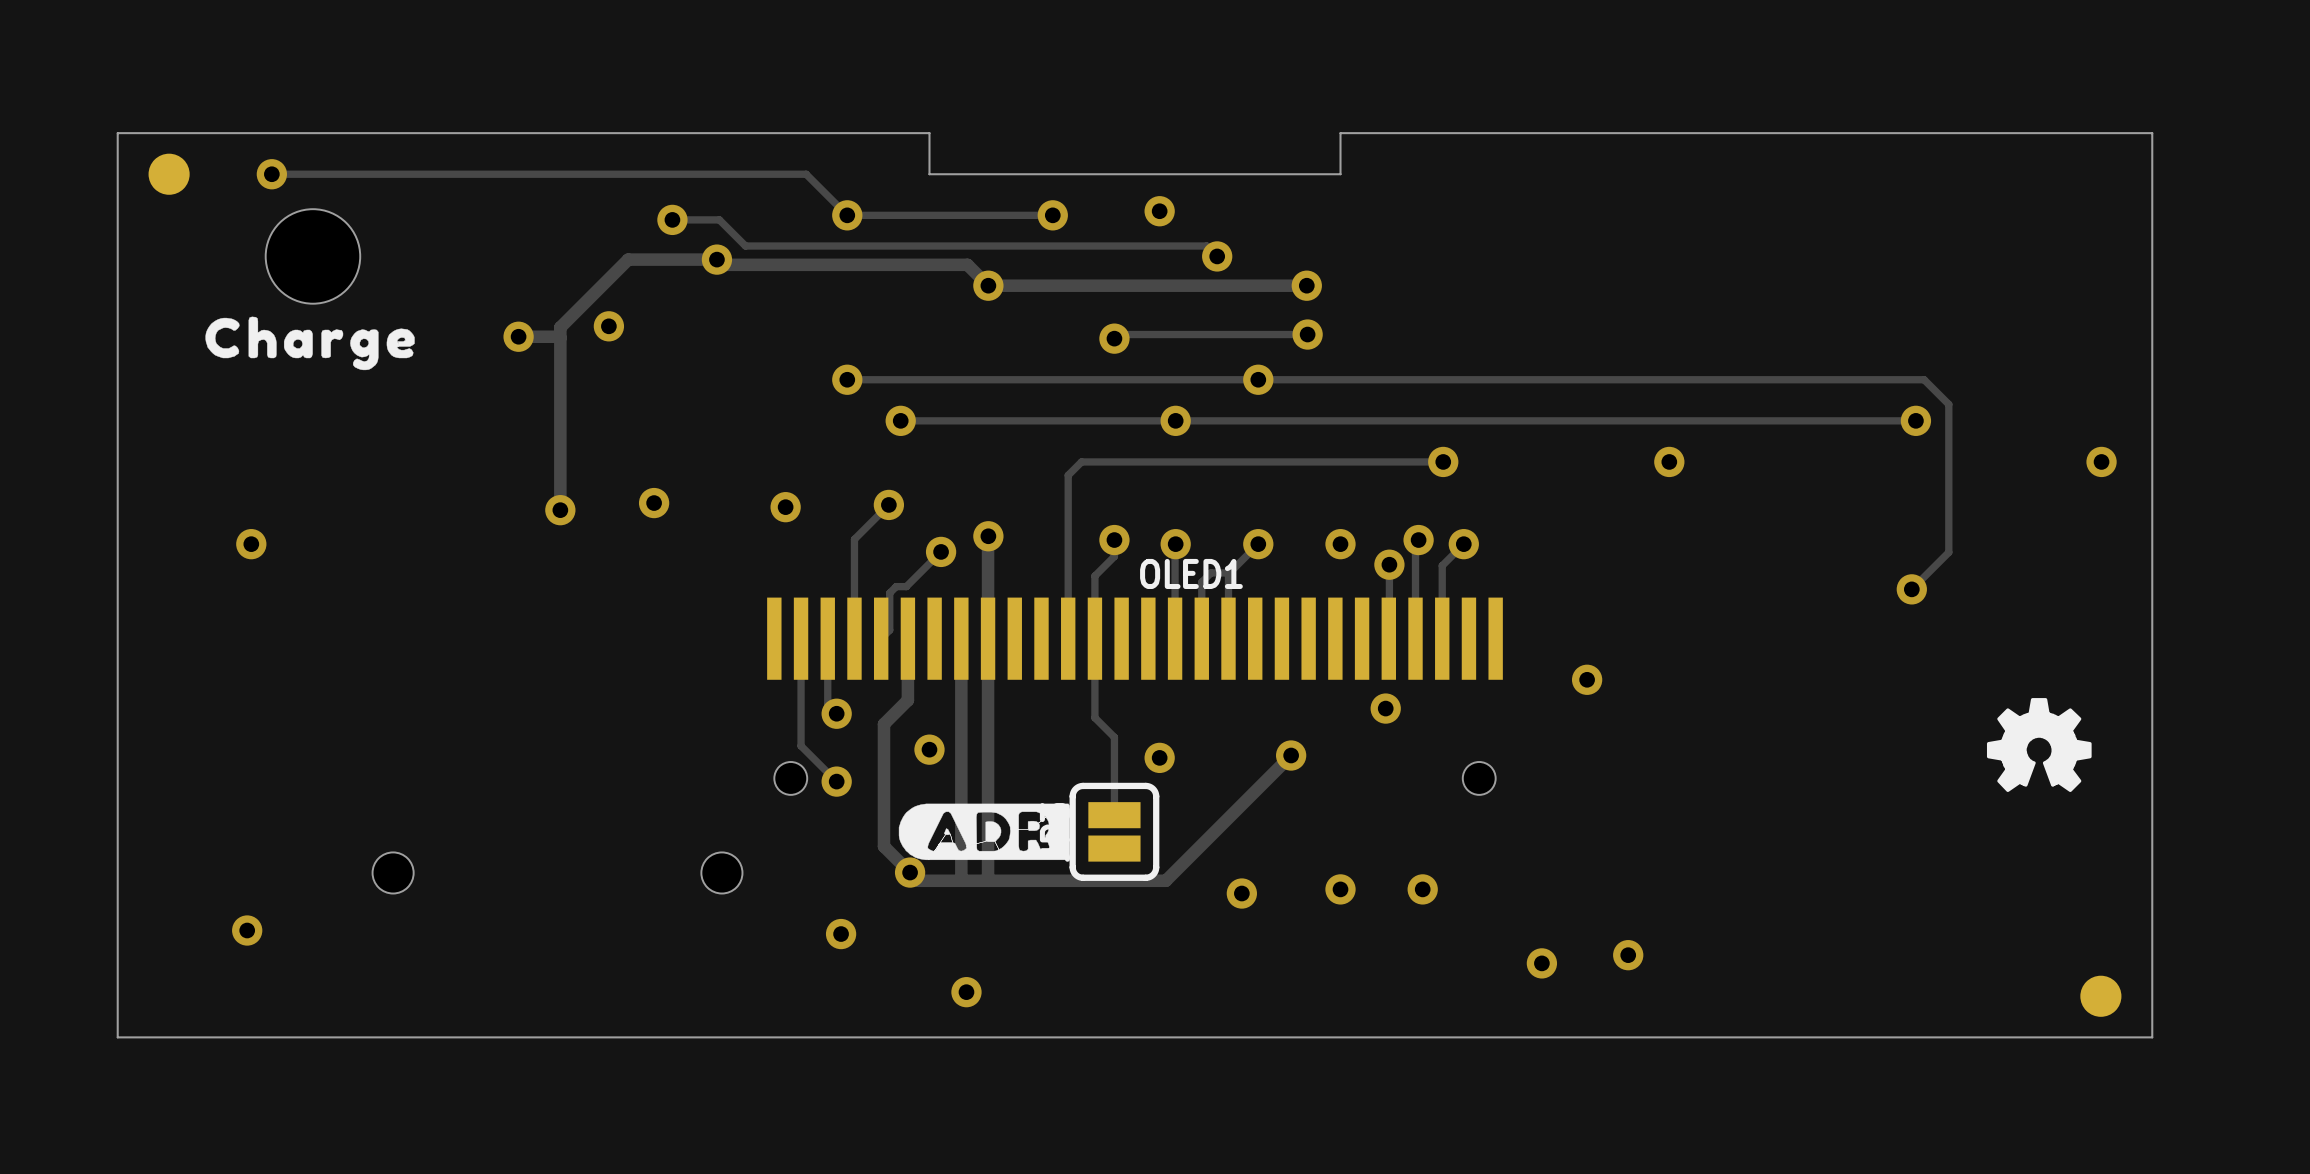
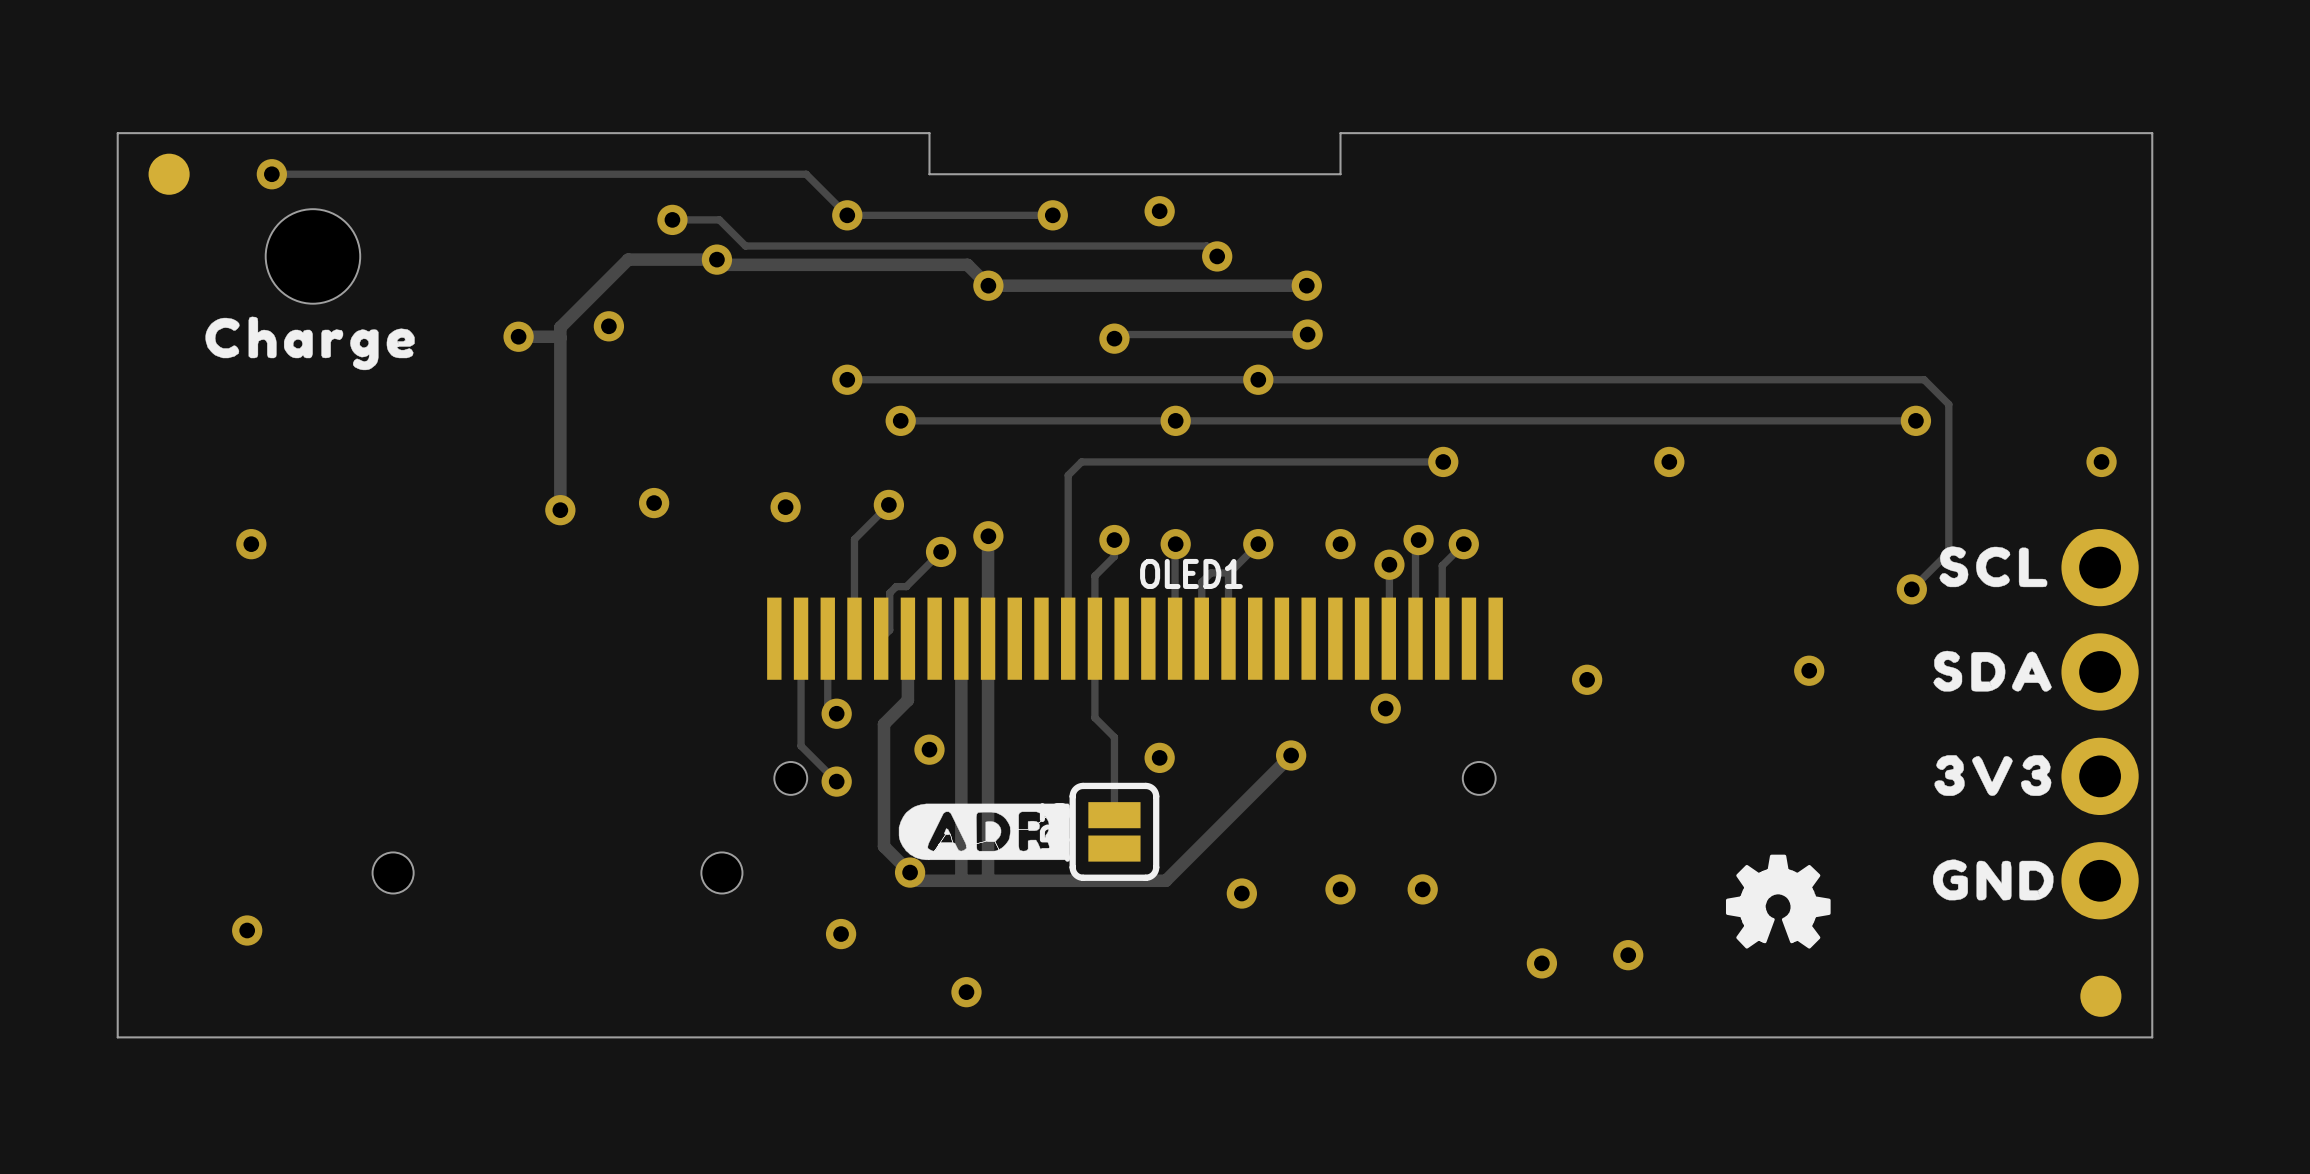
drawing: none -> [1939, 546, 2048, 588]
drawing: none -> [1933, 650, 2052, 692]
via: none -> (1809, 670)
part: none -> (2100, 724)
drawing position: (2039, 745) -> (1778, 901)
drawing: none -> [1934, 755, 2052, 796]
drawing: none -> [1932, 859, 2054, 901]

